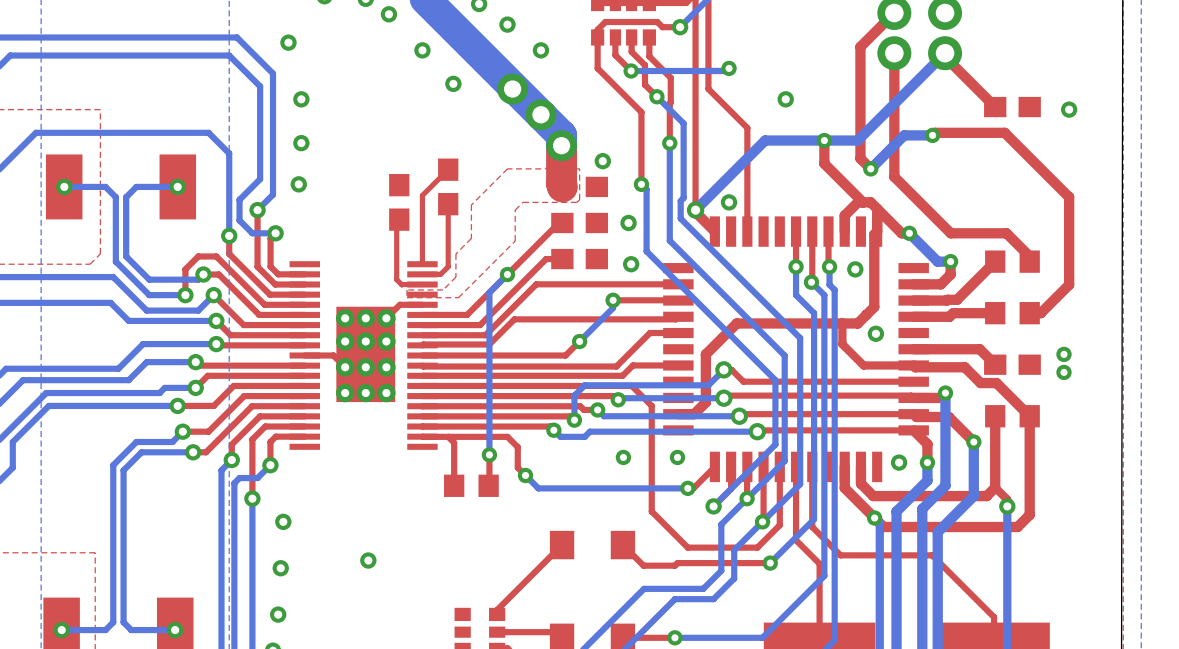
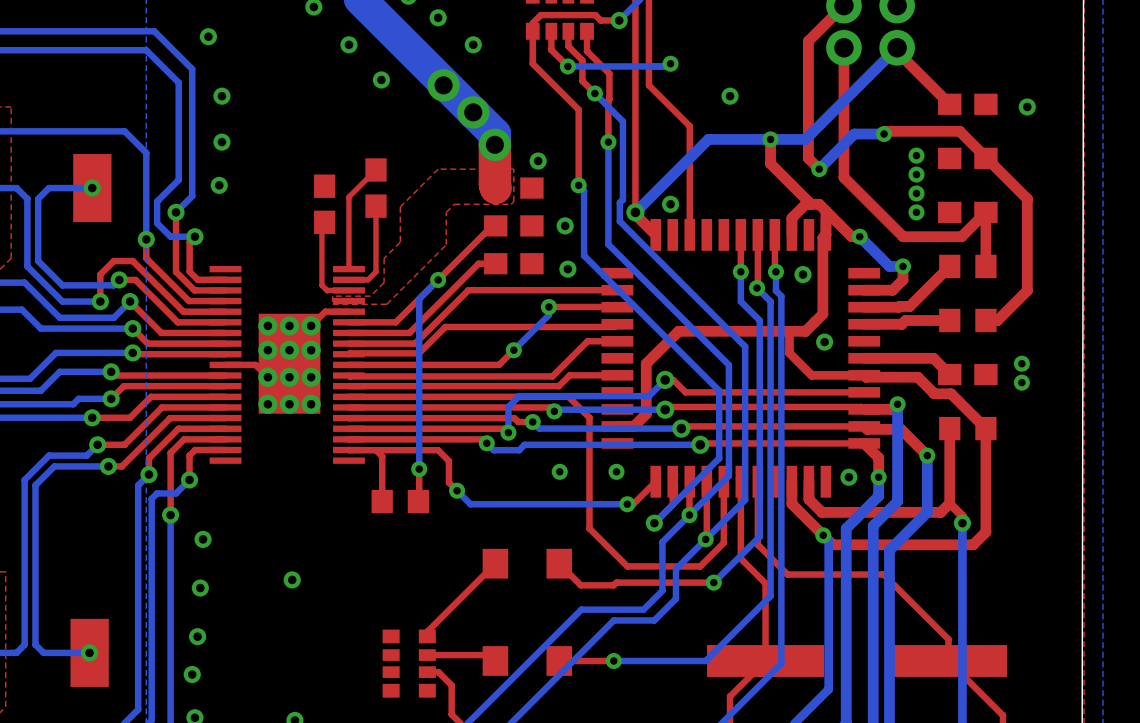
via: none -> (916, 155)
part: none -> (967, 158)
via: none -> (916, 174)
via: none -> (916, 193)
via: none -> (916, 212)
part: none -> (967, 212)
top track: (1006, 233) (1029, 256) -> (961, 236) (985, 212) (985, 261)

